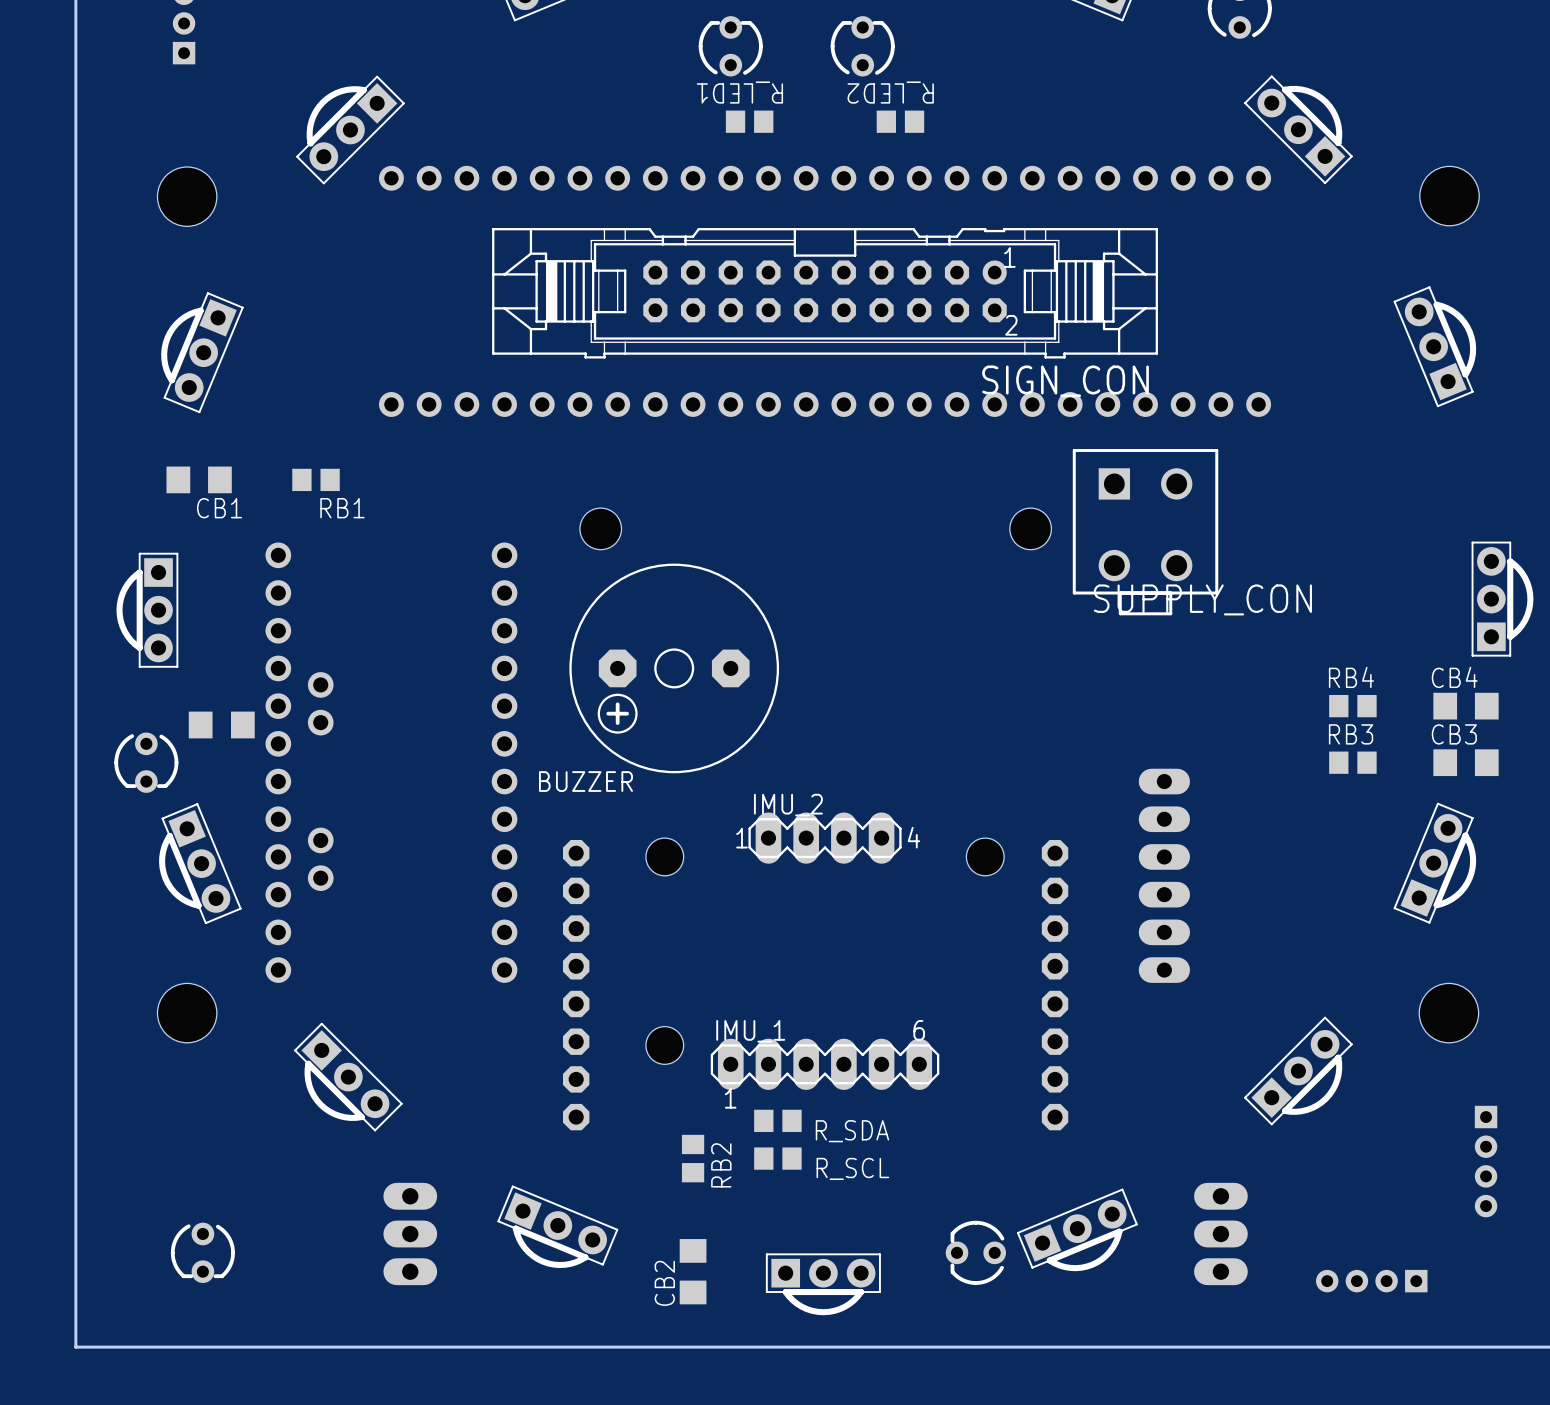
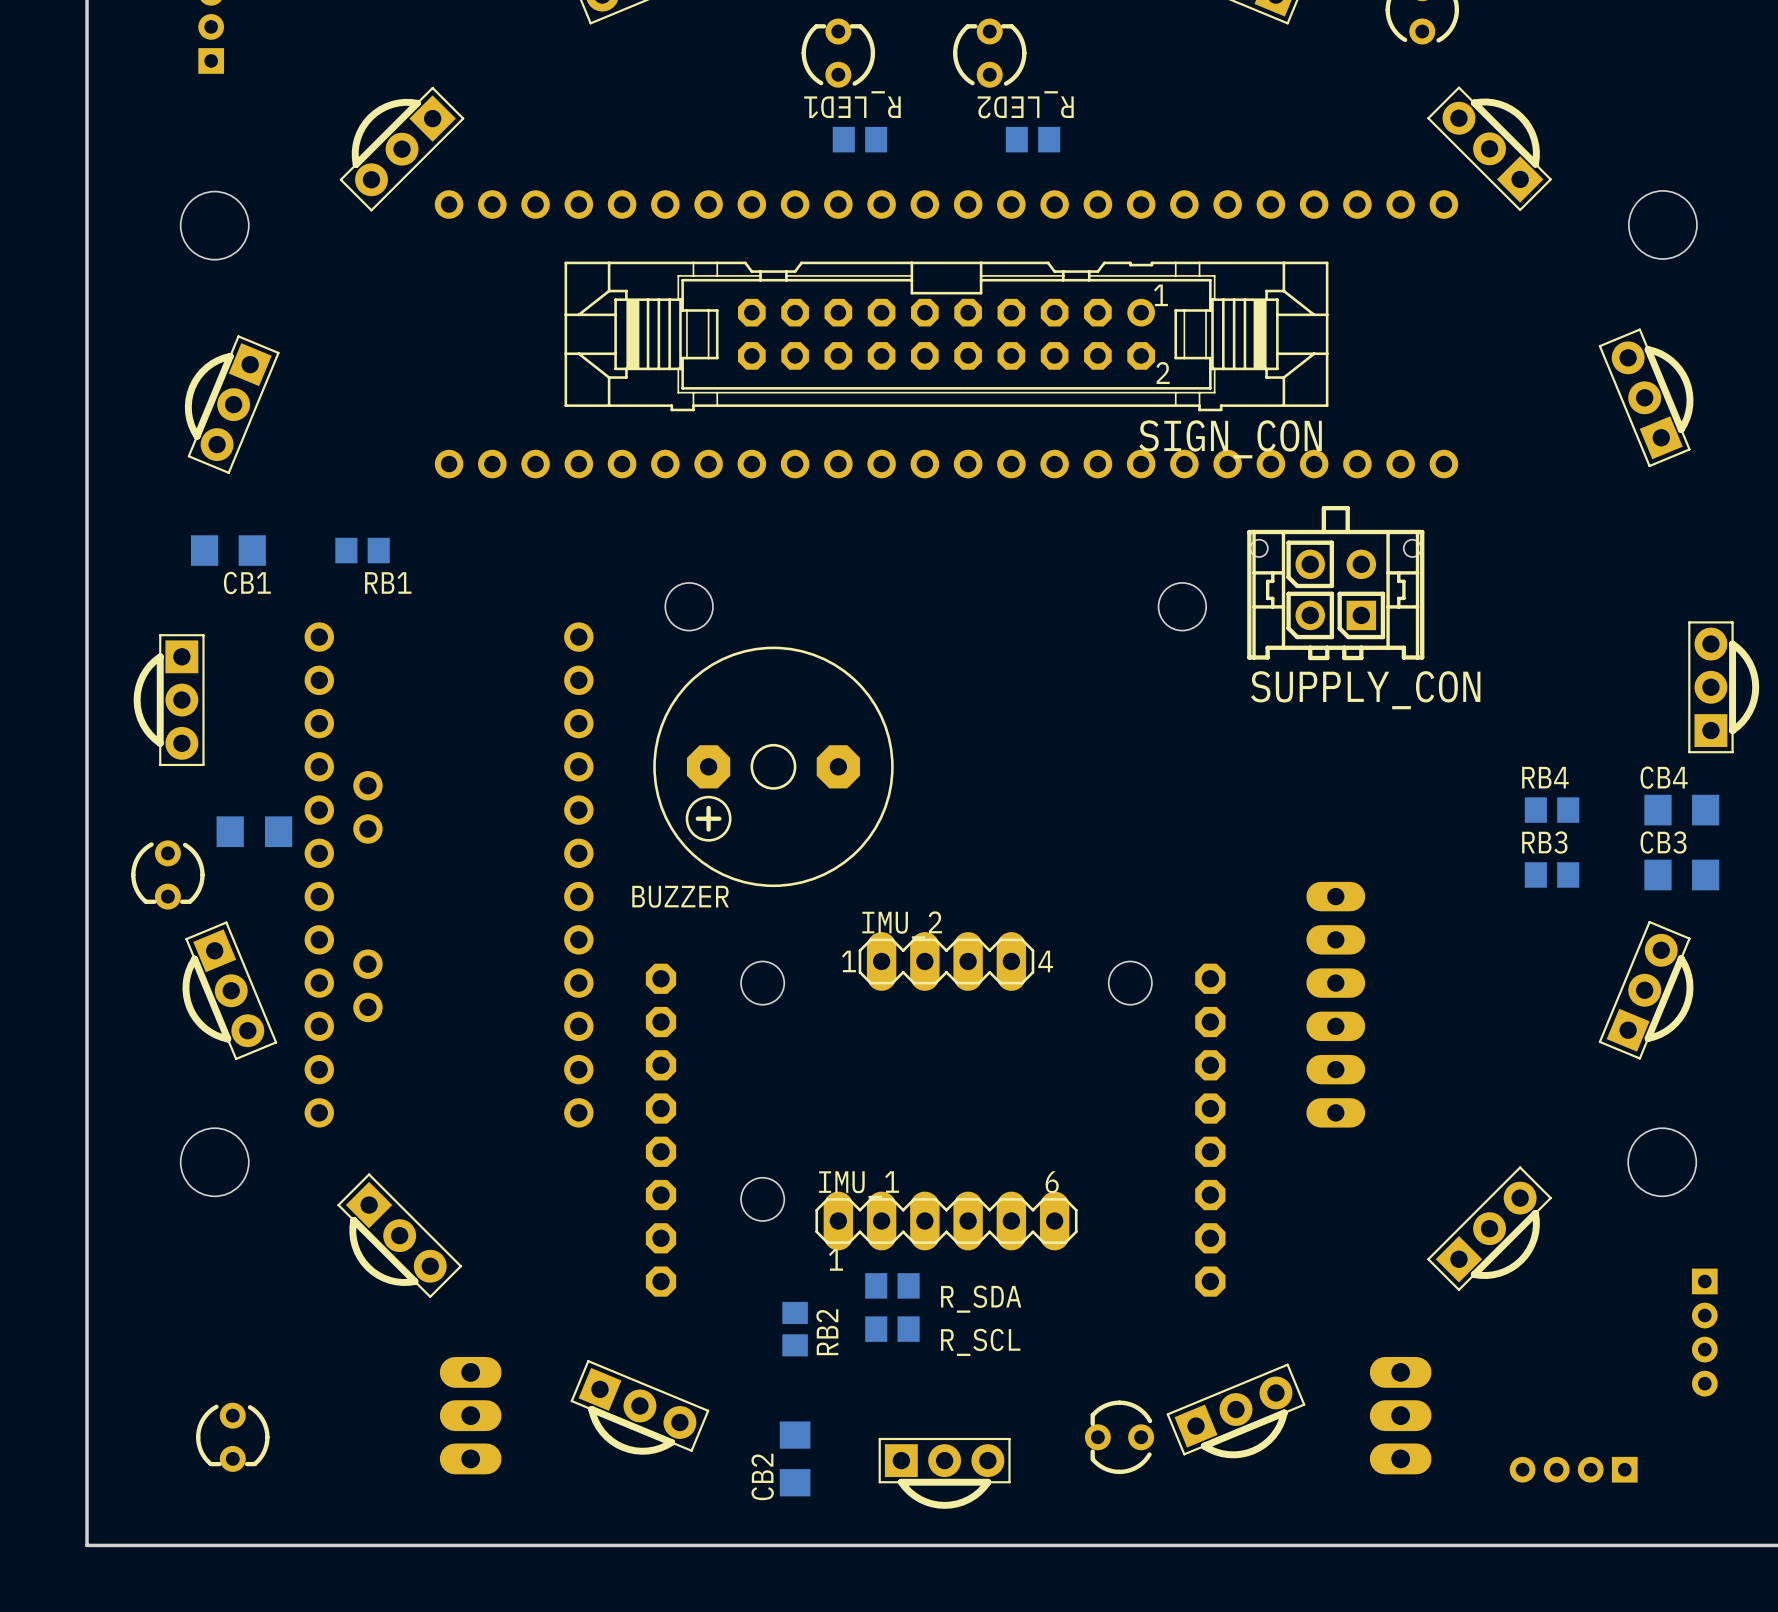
part: none -> (1335, 583)
part: (1145, 532) -> none

